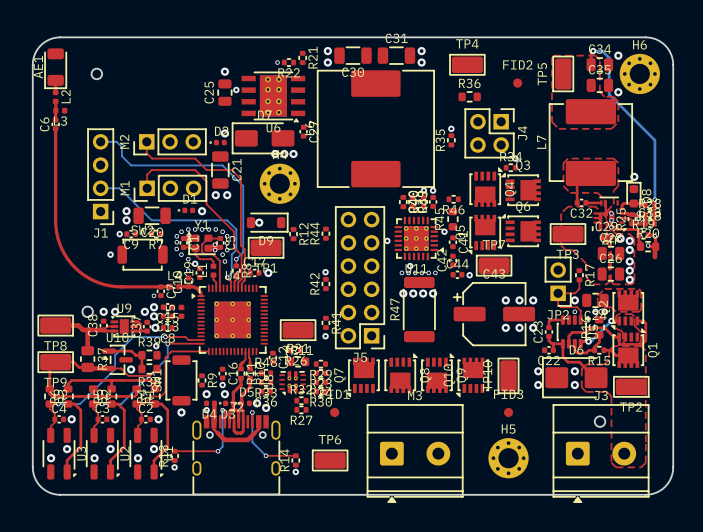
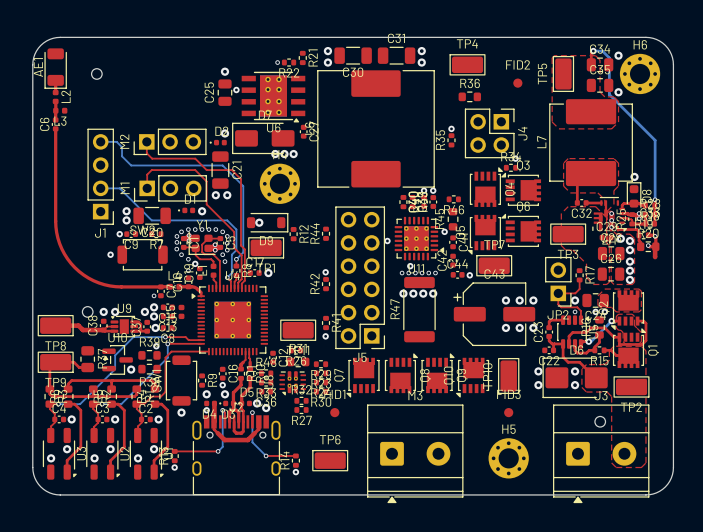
top track: (87, 329) (87, 350) -> none
top track: (108, 351) (131, 351) (135, 355) (141, 355) (141, 371) -> none
top track: (87, 367) (121, 368) (128, 375) (150, 375) (156, 369) -> none

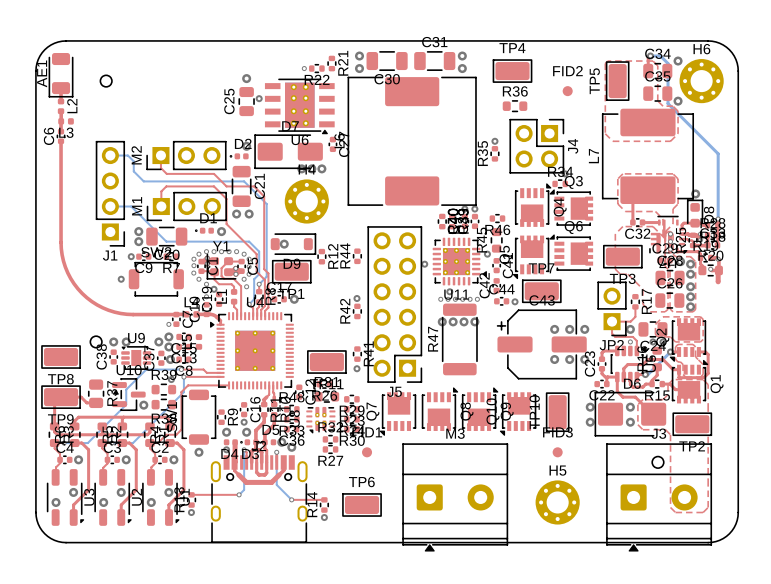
top track: (134, 321) (140, 324) (140, 331) -> none
top track: (55, 325) (78, 325) (82, 330) (103, 330) -> none
top track: (114, 326) (107, 326) (103, 330) -> none
top track: (103, 330) (114, 331) -> none
top track: (134, 331) (144, 331) -> none

